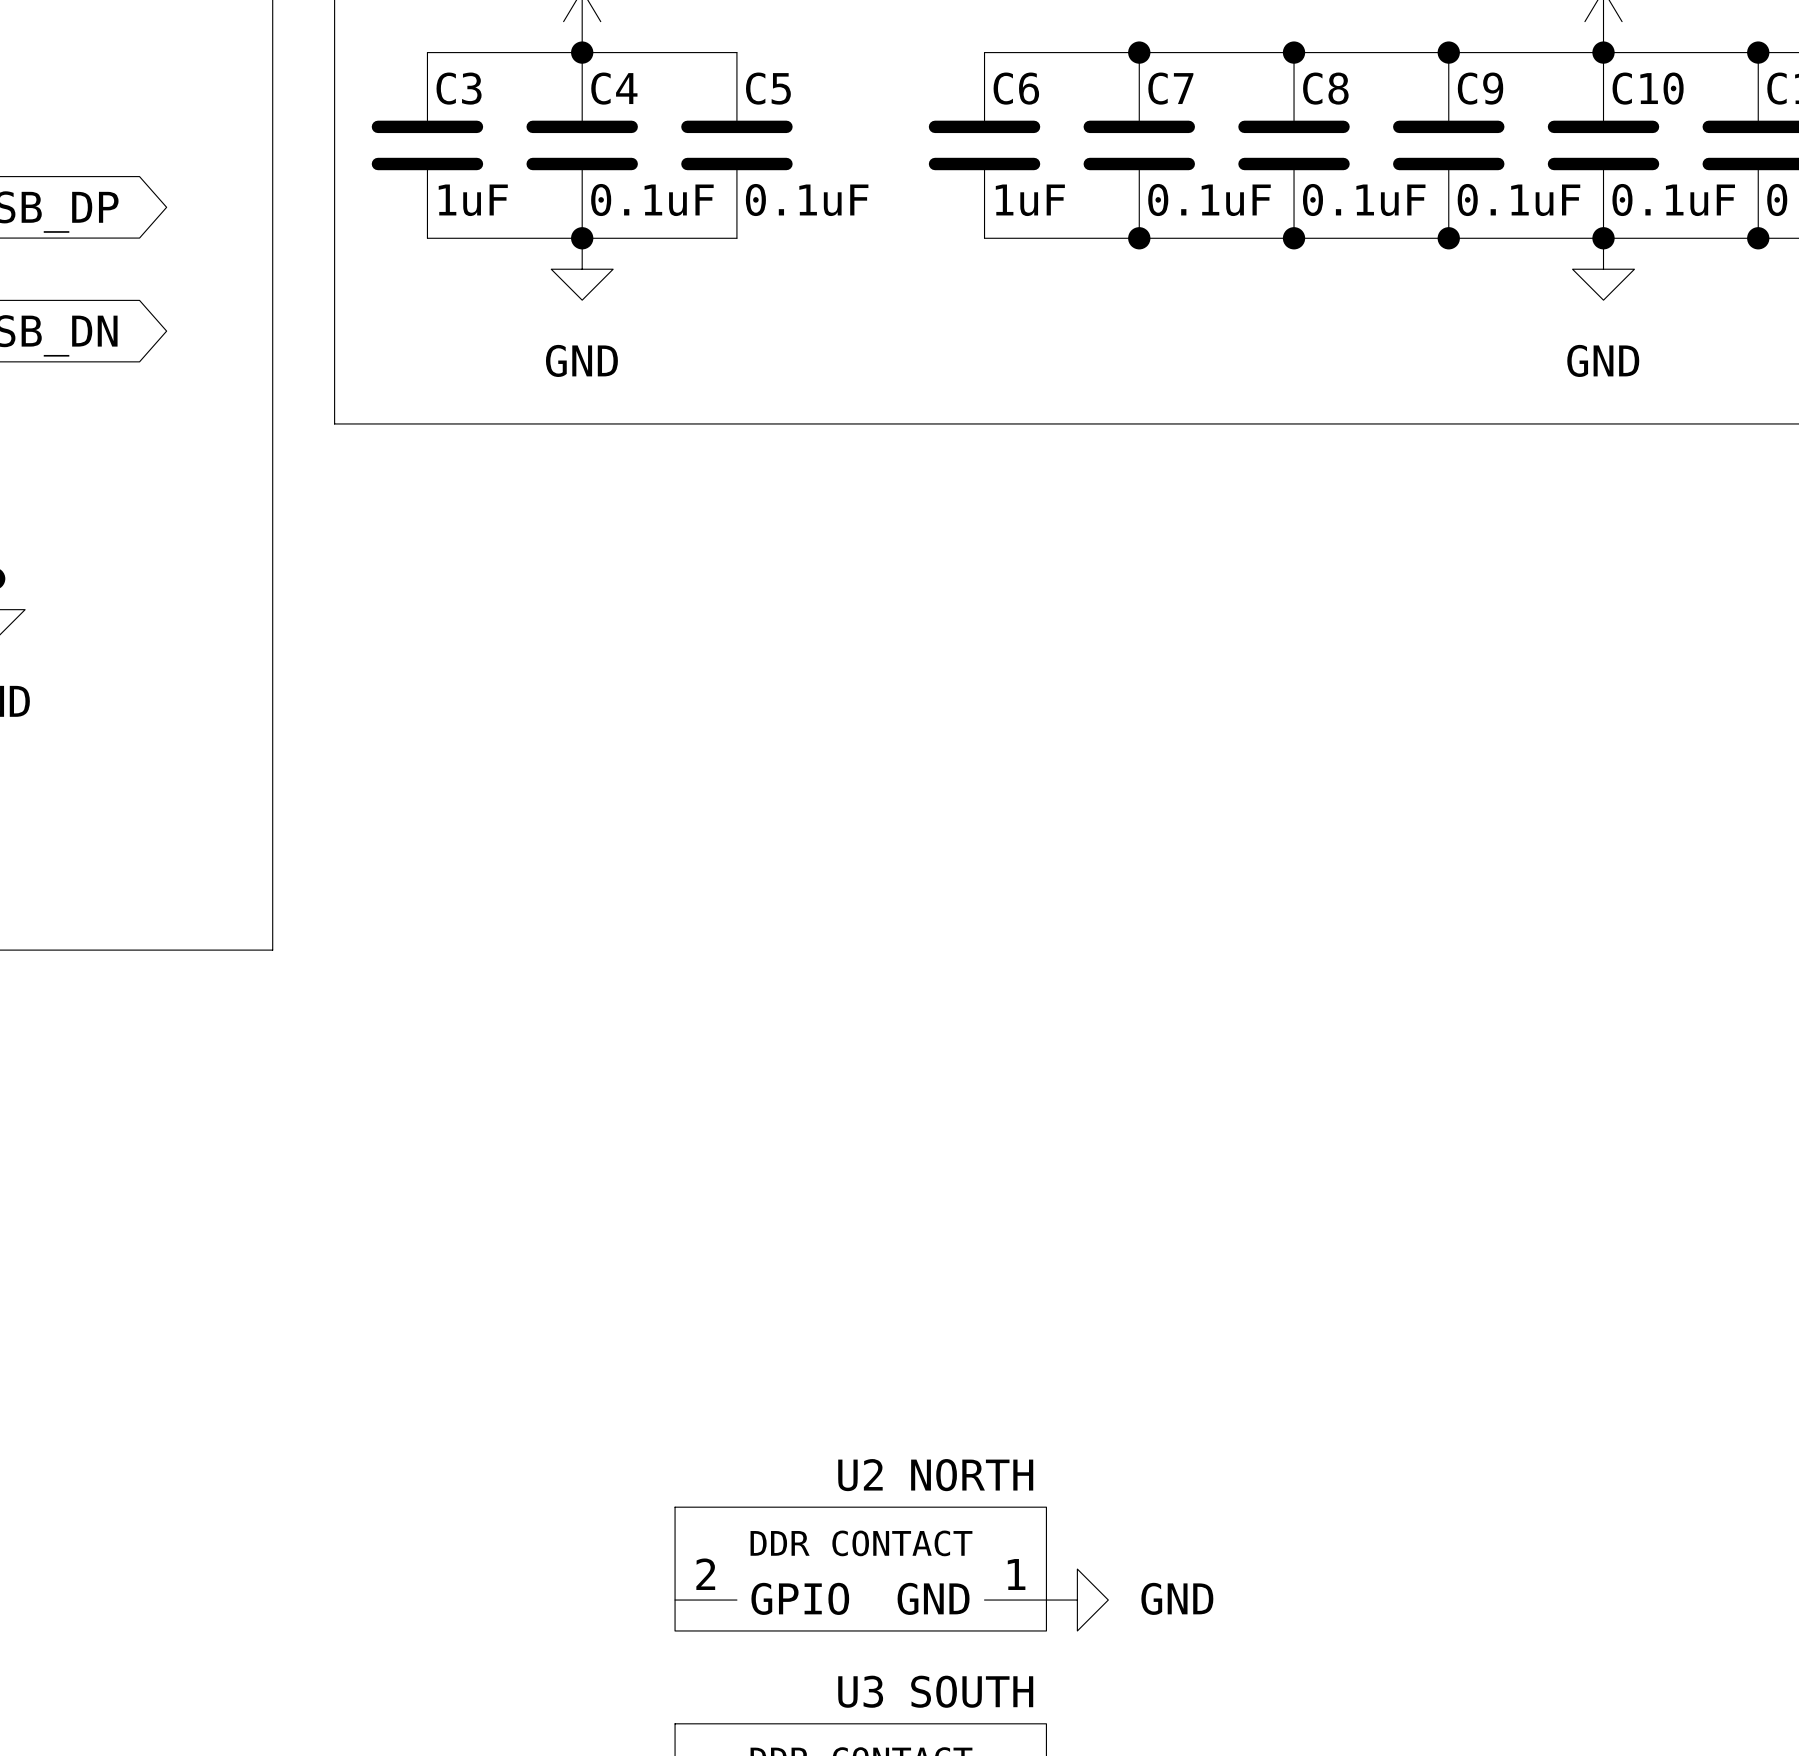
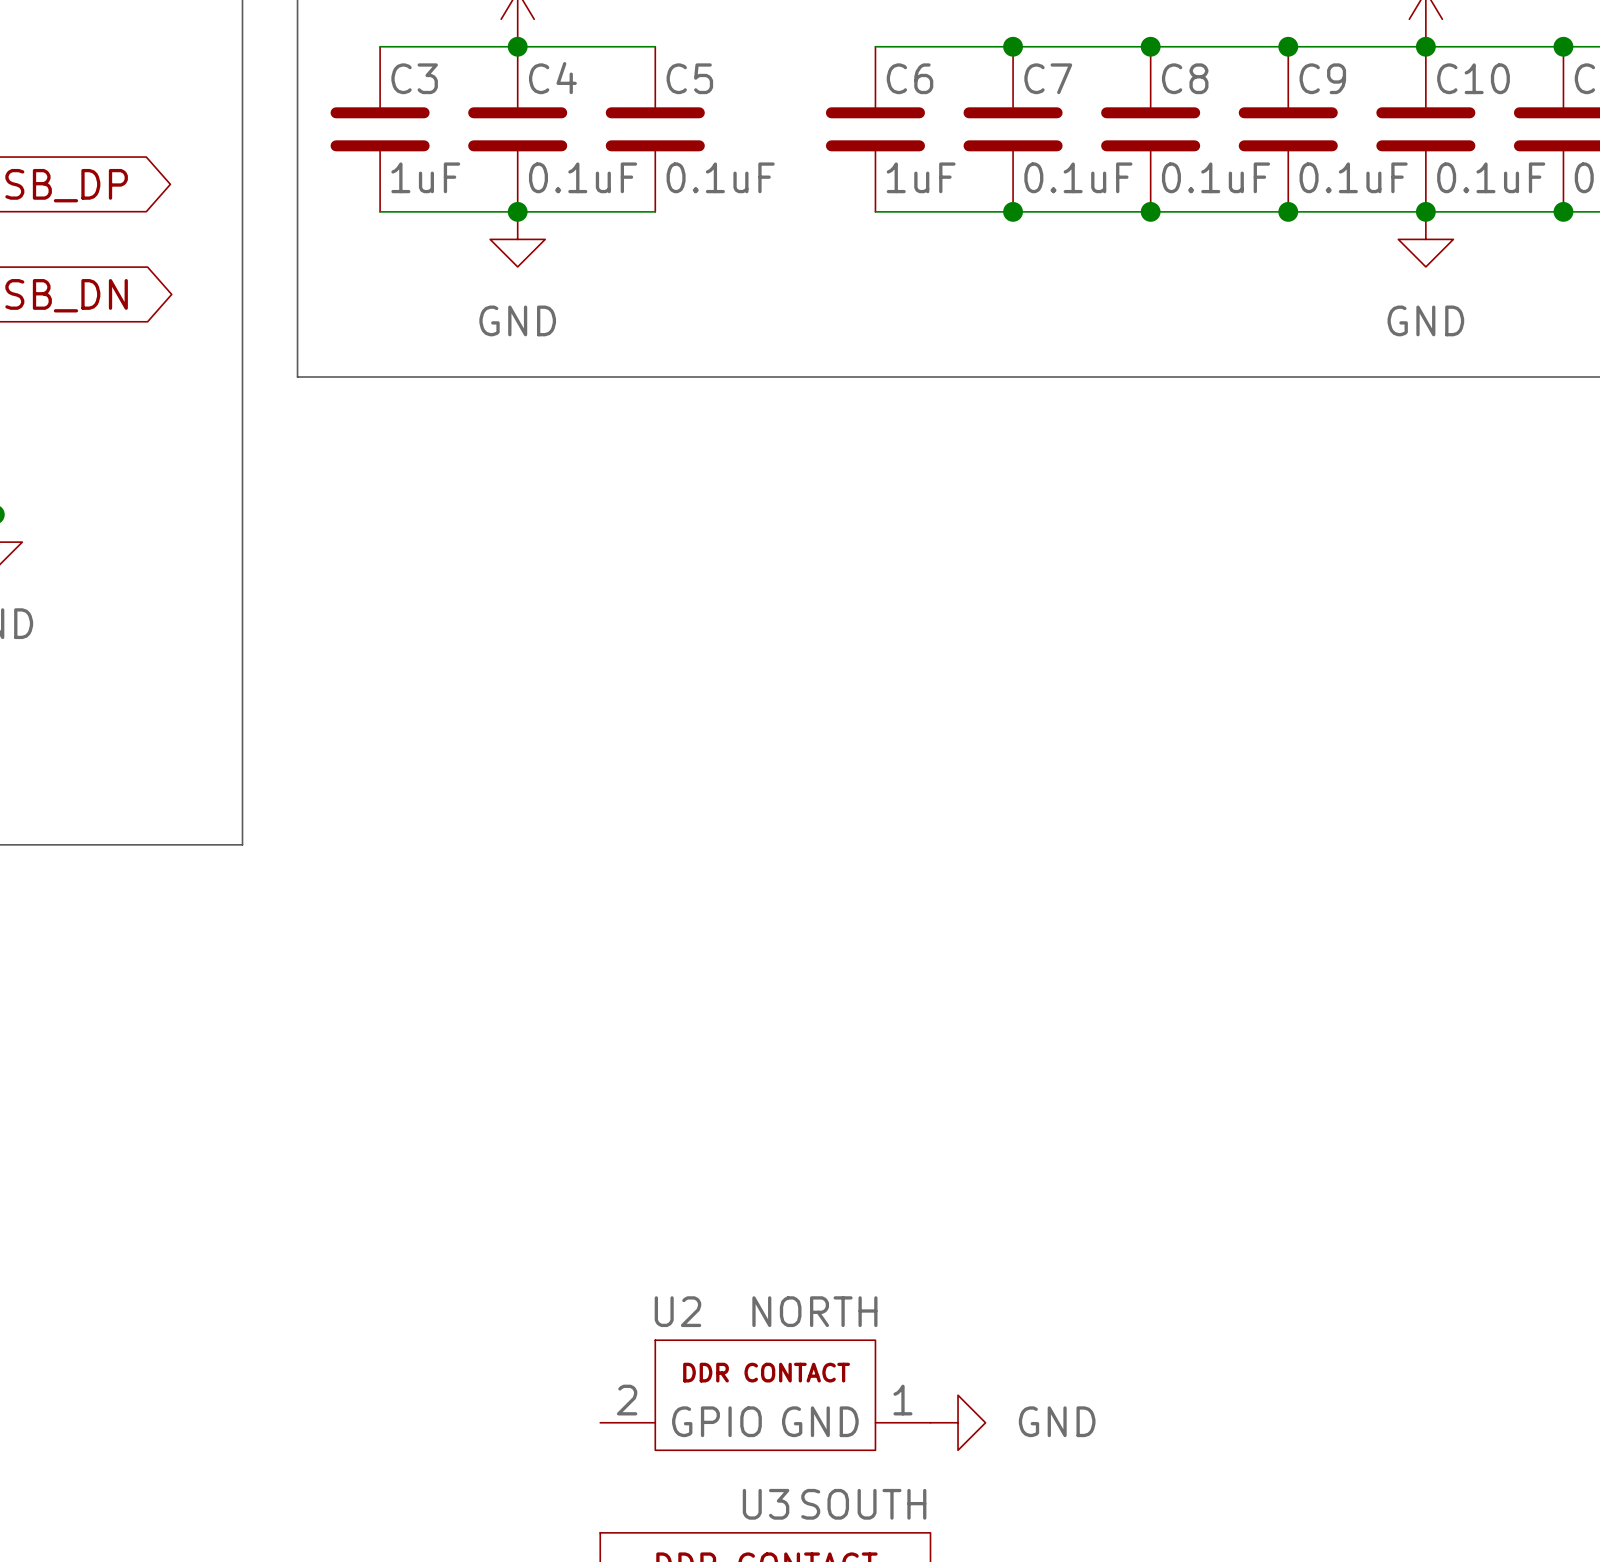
U2 name position: U2 (860, 1475) -> U2 (677, 1311)
U2 value position: NORTH (972, 1475) -> NORTH (814, 1311)
U2 symbol: [675, 1507, 1047, 1631] -> [600, 1340, 931, 1451]

